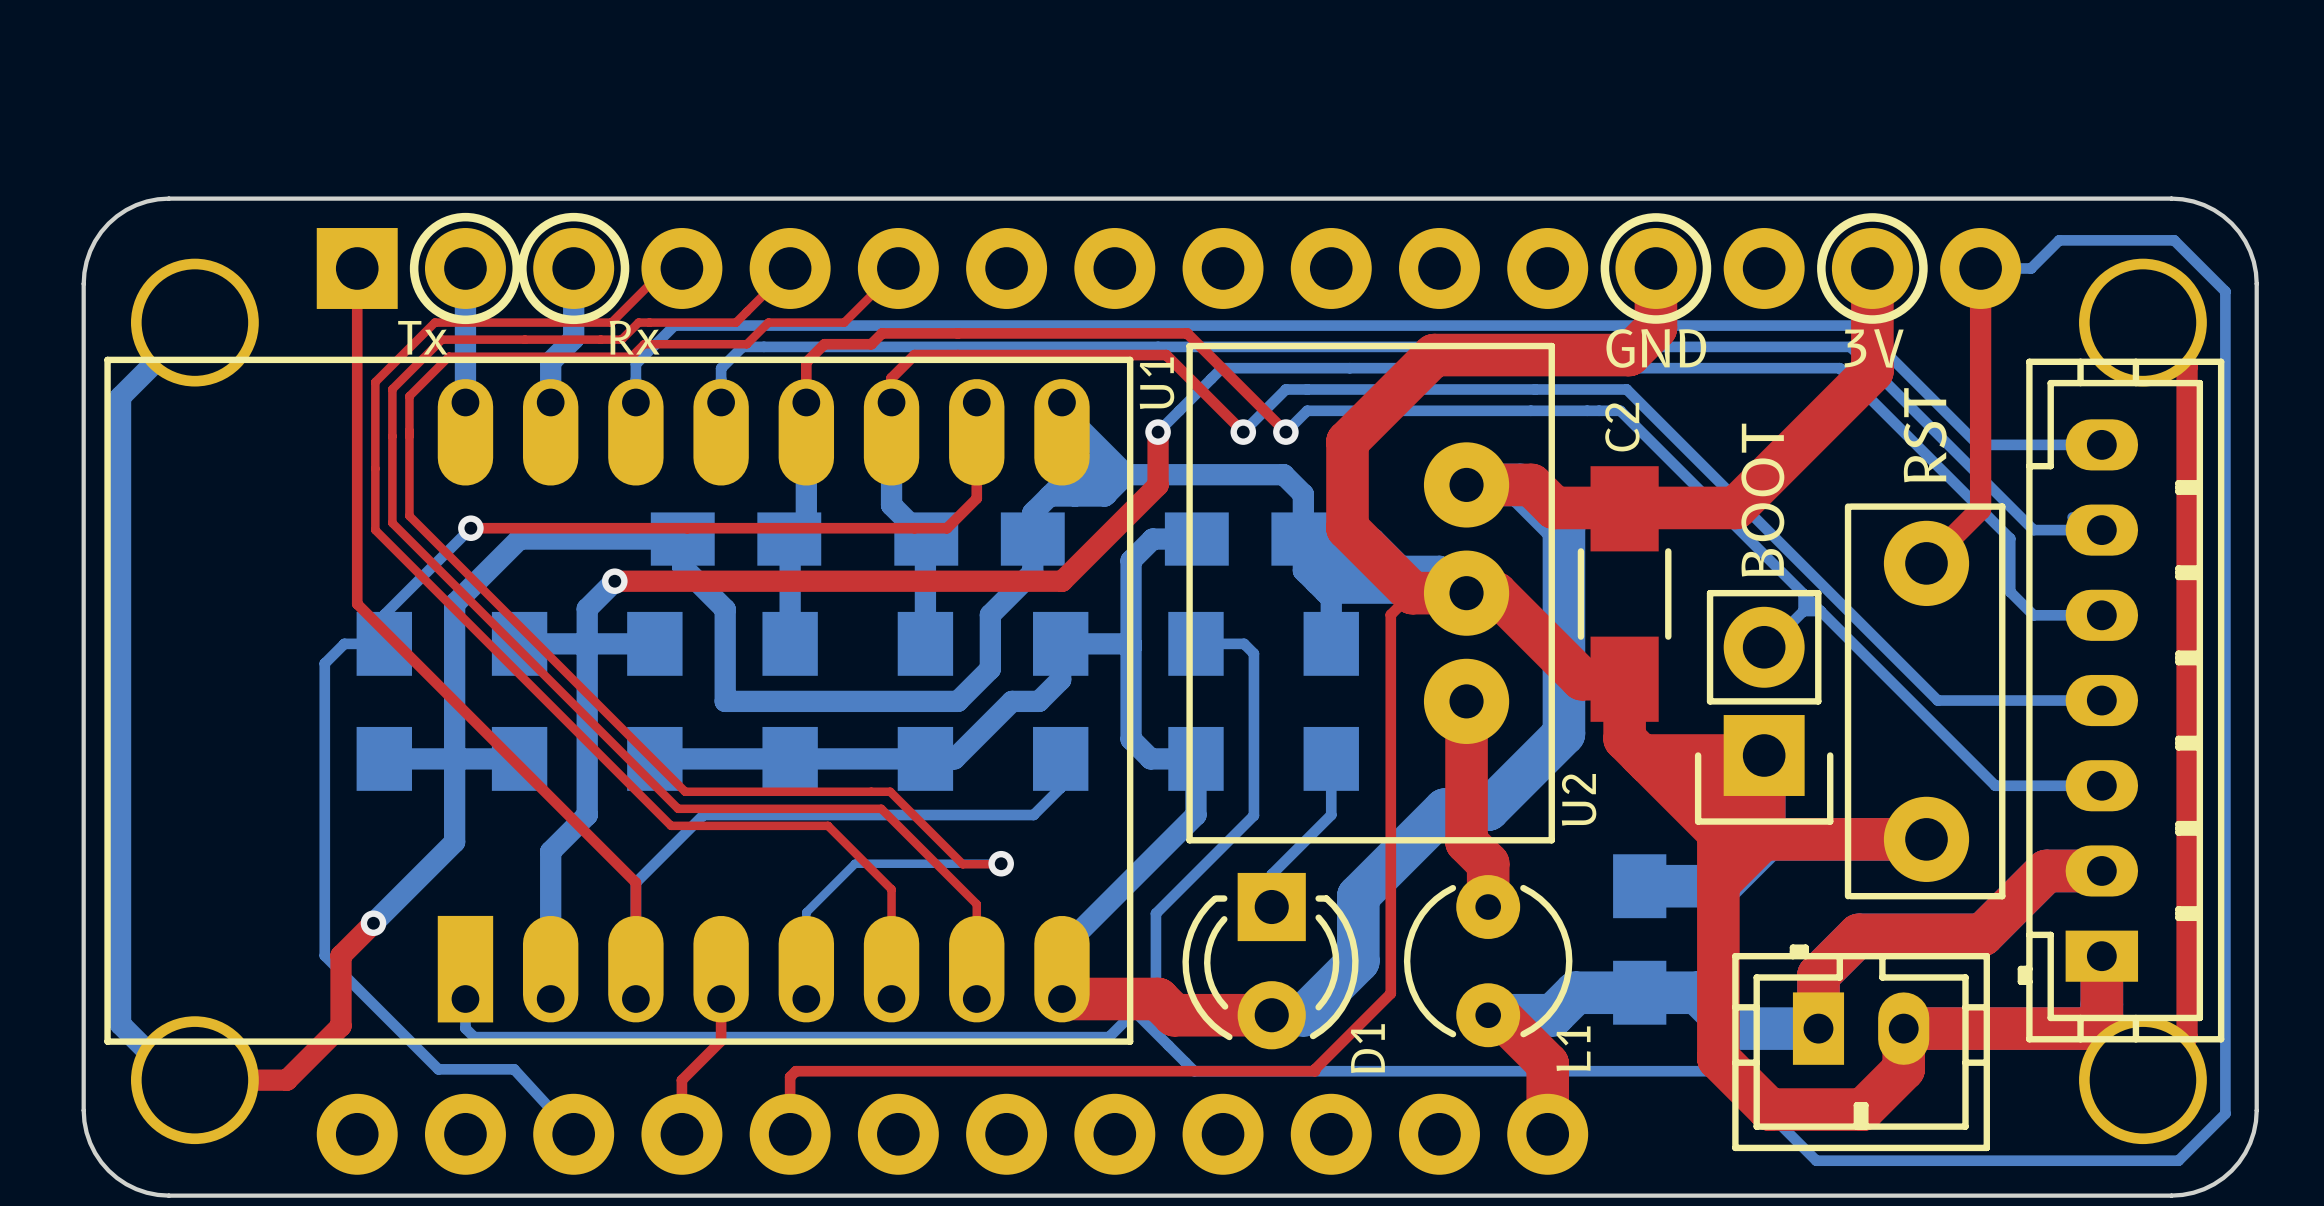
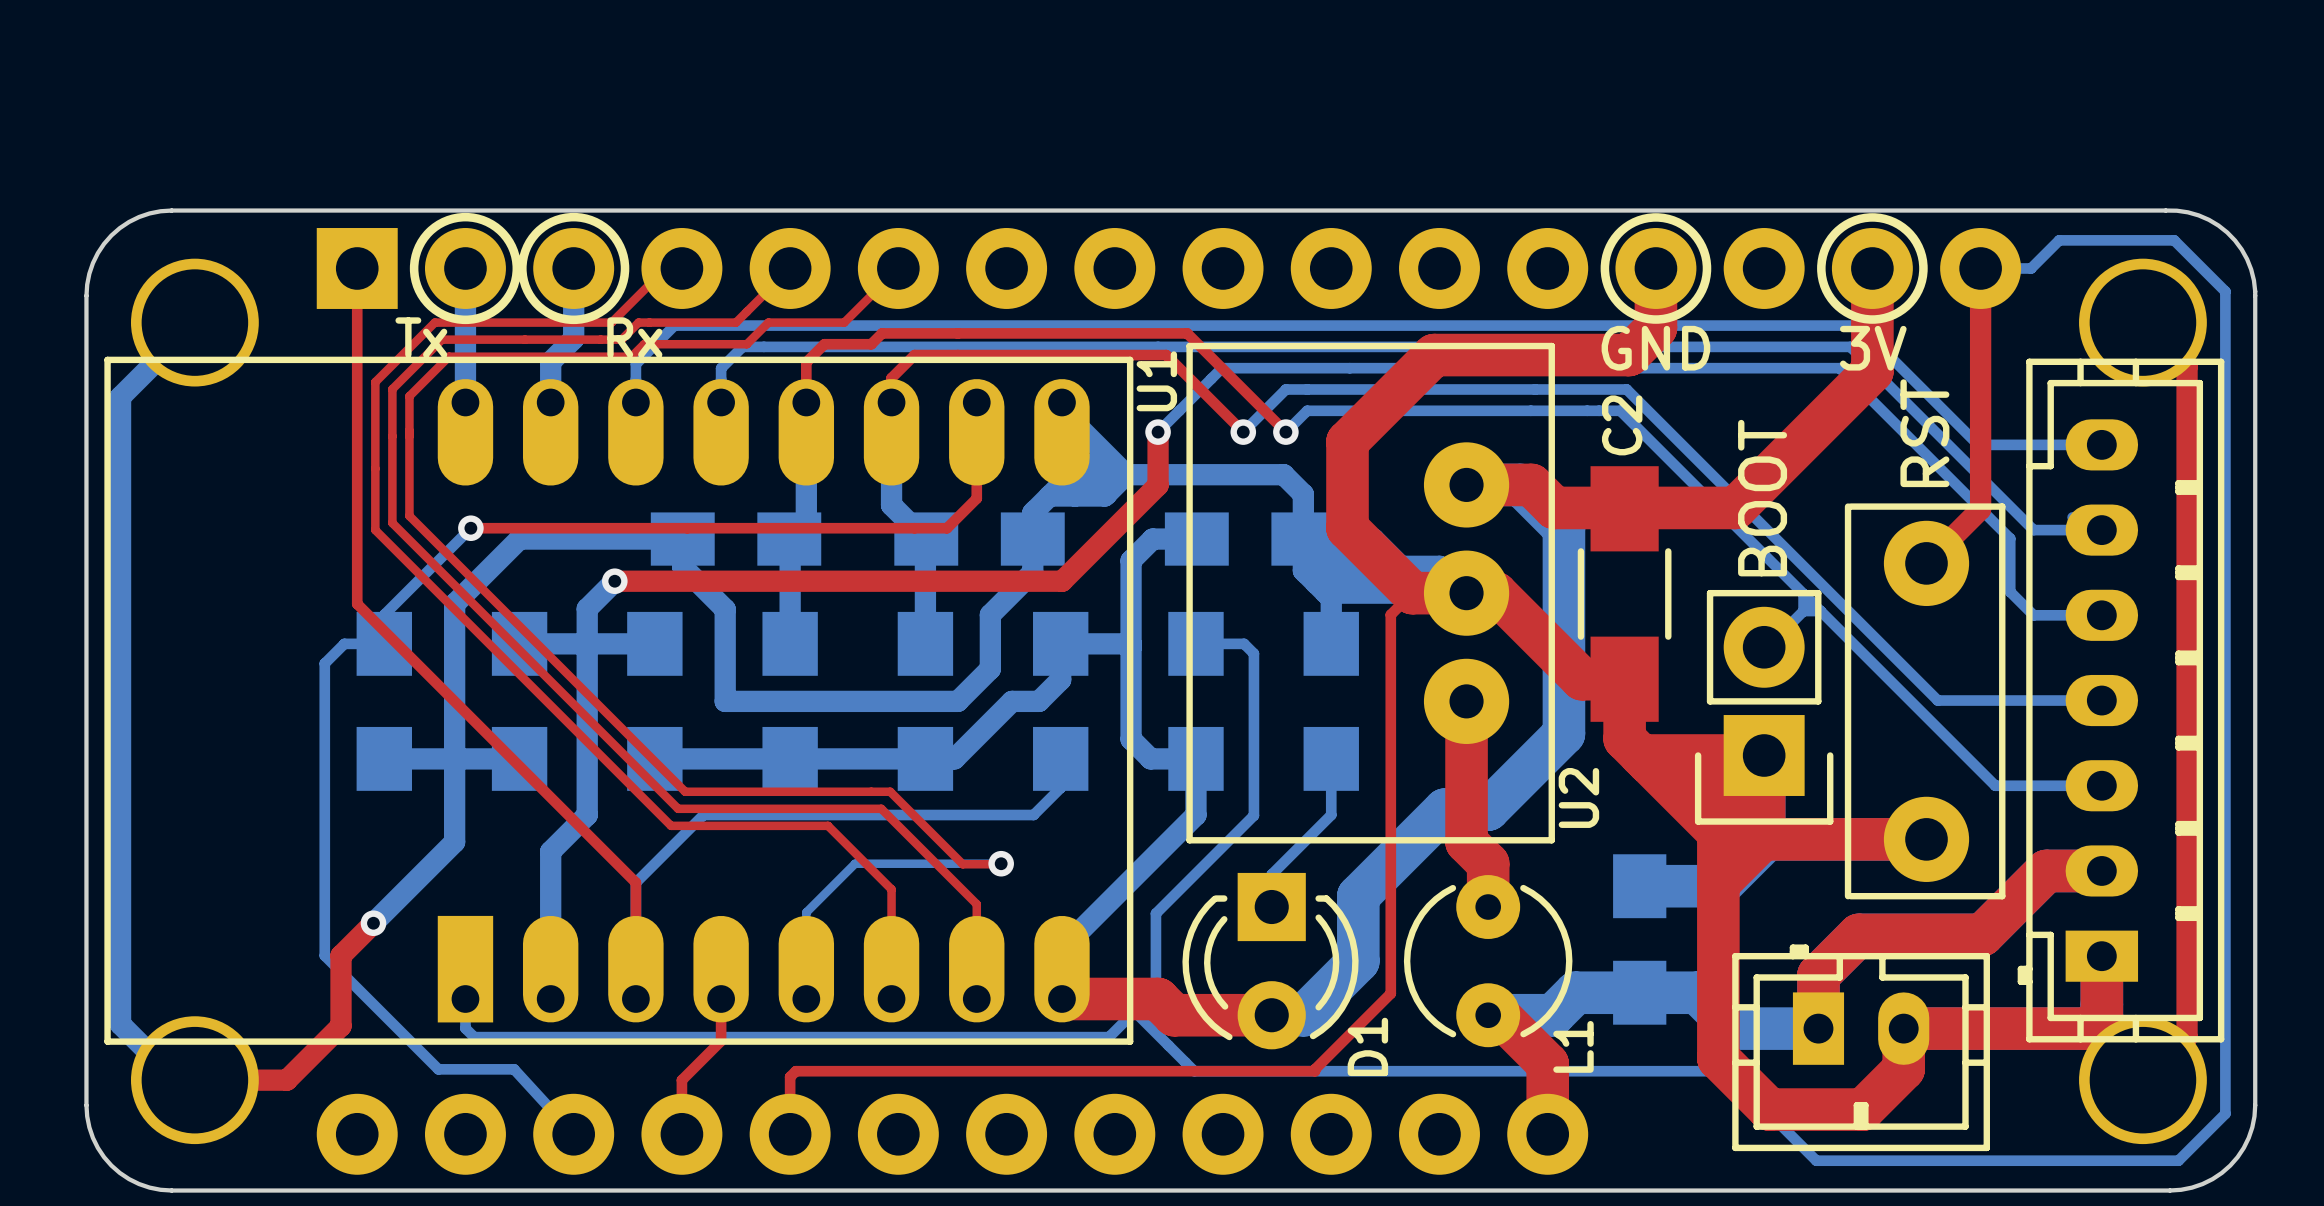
board edge: (168, 198) (2171, 198) (2204, 205) (2223, 216) (2239, 231) (2250, 251) (2256, 283) (2256, 1110) (2250, 1143) (2231, 1170) (2214, 1184) (2193, 1192) (2171, 1195) (168, 1195) (136, 1189) (117, 1178) (95, 1153) (86, 1132) (83, 1110) (83, 283) (90, 251) (108, 223) (136, 205) (168, 198) -> (171, 210) (139, 217) (111, 235) (92, 263) (86, 295) (86, 1105) (89, 1127) (97, 1147) (119, 1172) (139, 1184) (171, 1190) (2170, 1190) (2192, 1187) (2212, 1179) (2230, 1165) (2248, 1137) (2255, 1105) (2255, 291) (2251, 269) (2241, 249) (2227, 232) (2208, 219) (2187, 212) (2165, 210) (171, 210)

